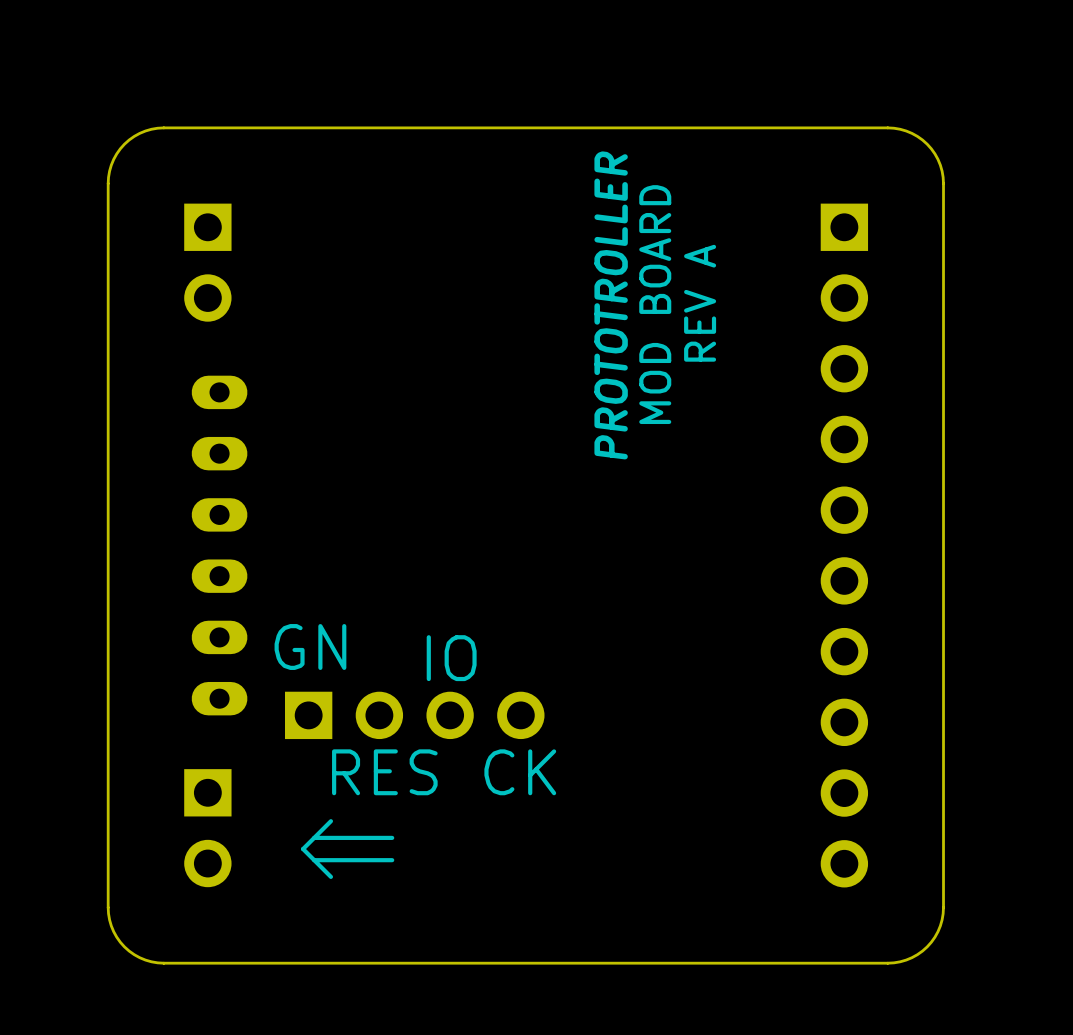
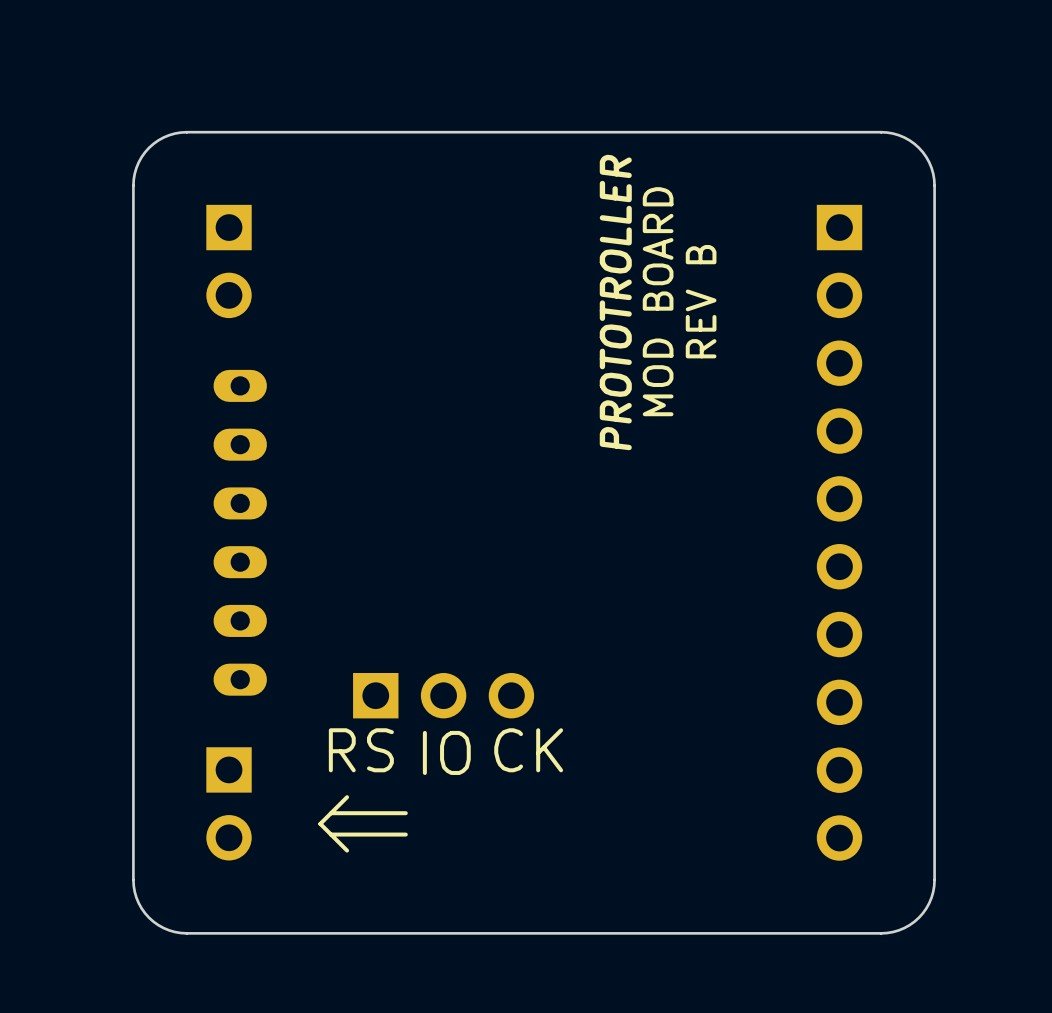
text: REV A (700, 303) -> REV B (701, 301)
text: GN (310, 647) -> none
text position: IO (451, 658) -> IO (446, 752)
part footprint: [284, 691, 545, 740] -> [353, 672, 535, 719]
text: RES (384, 772) -> RS (361, 750)

